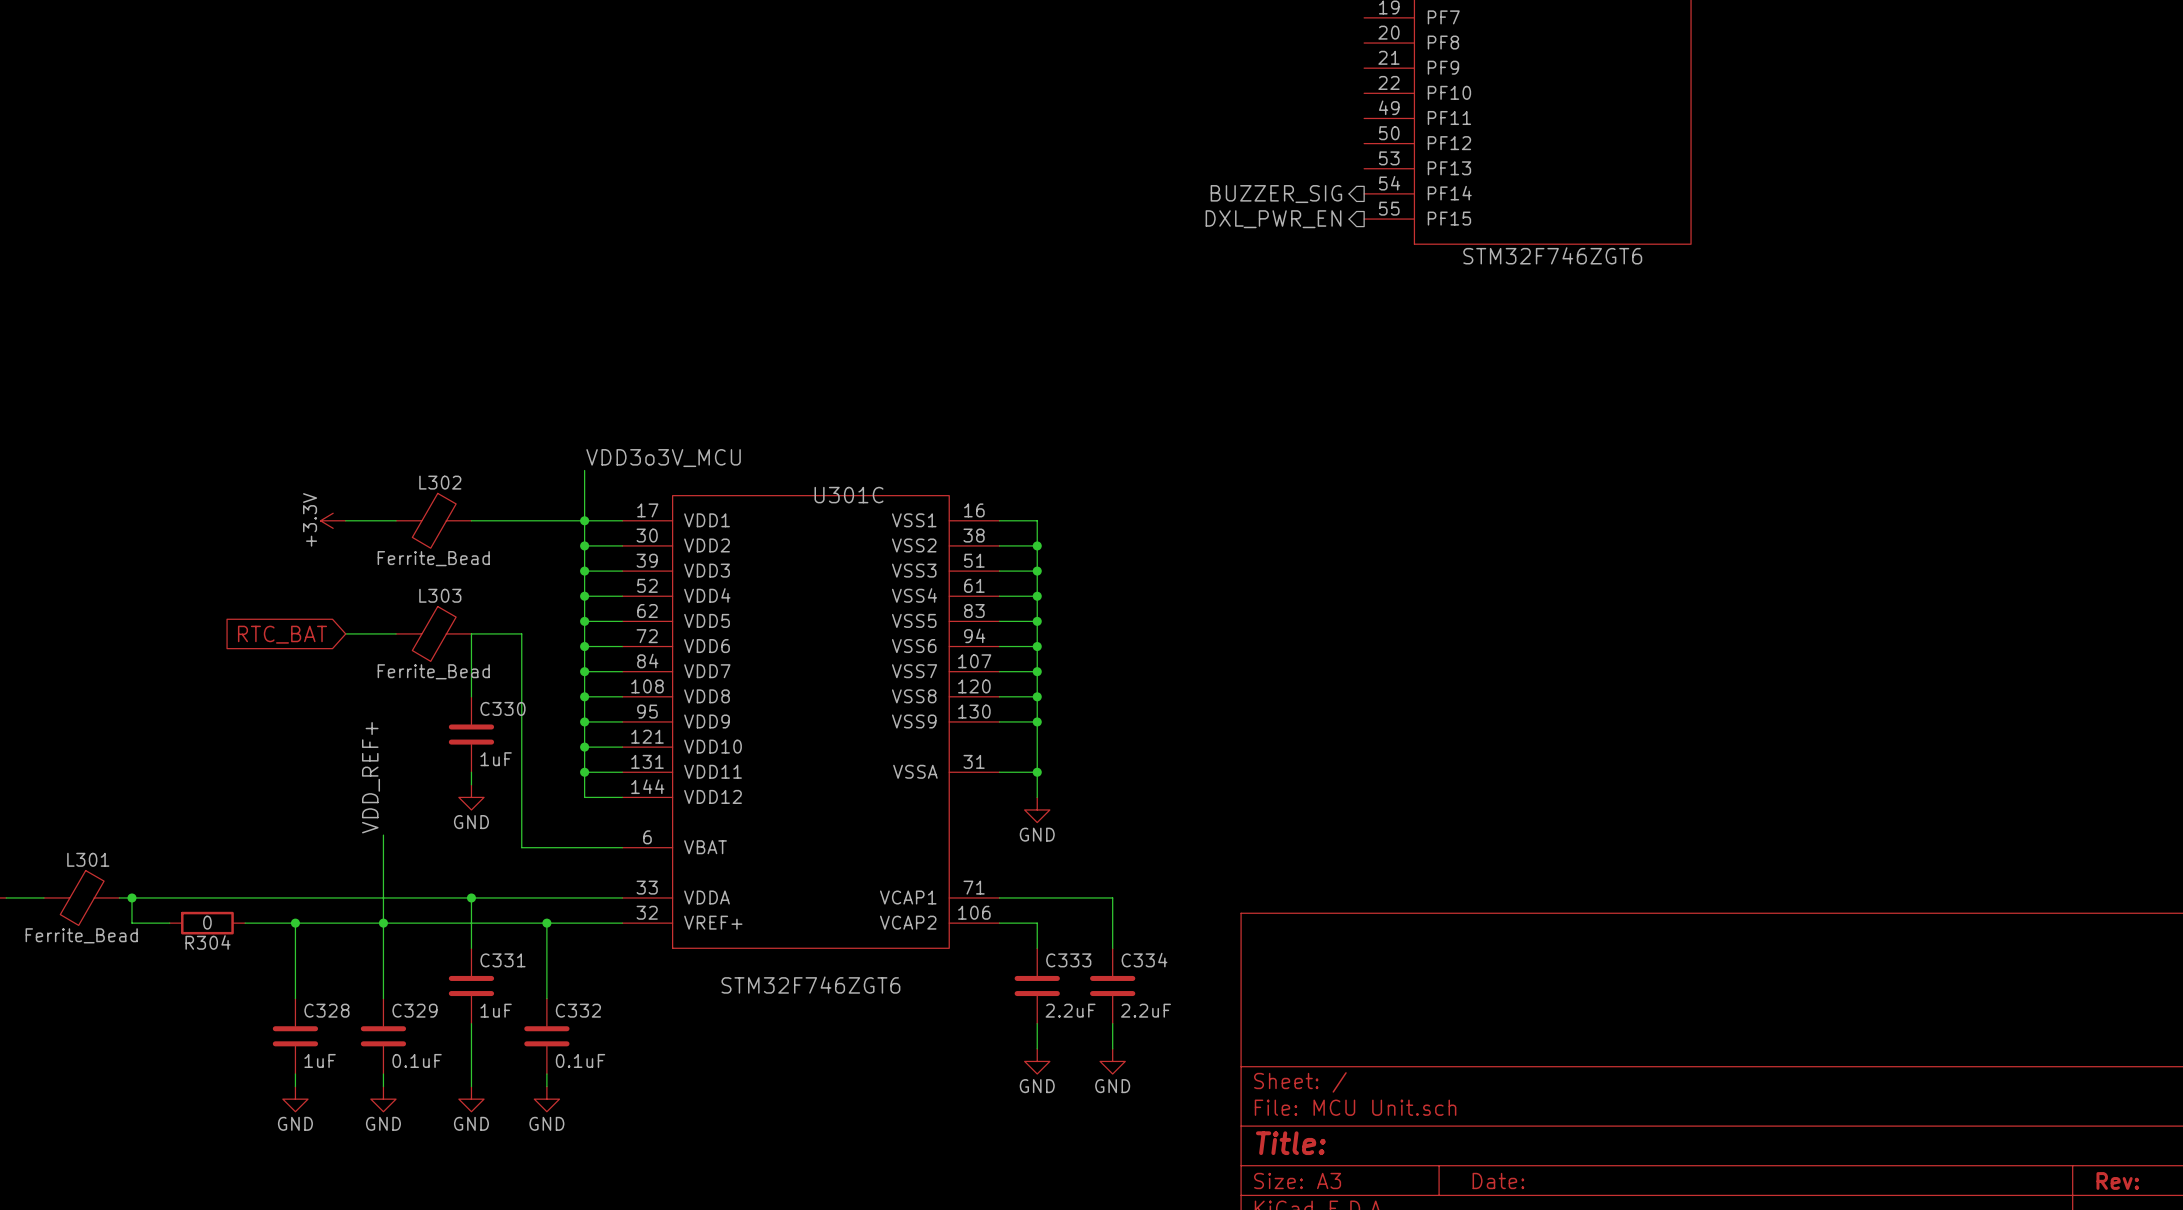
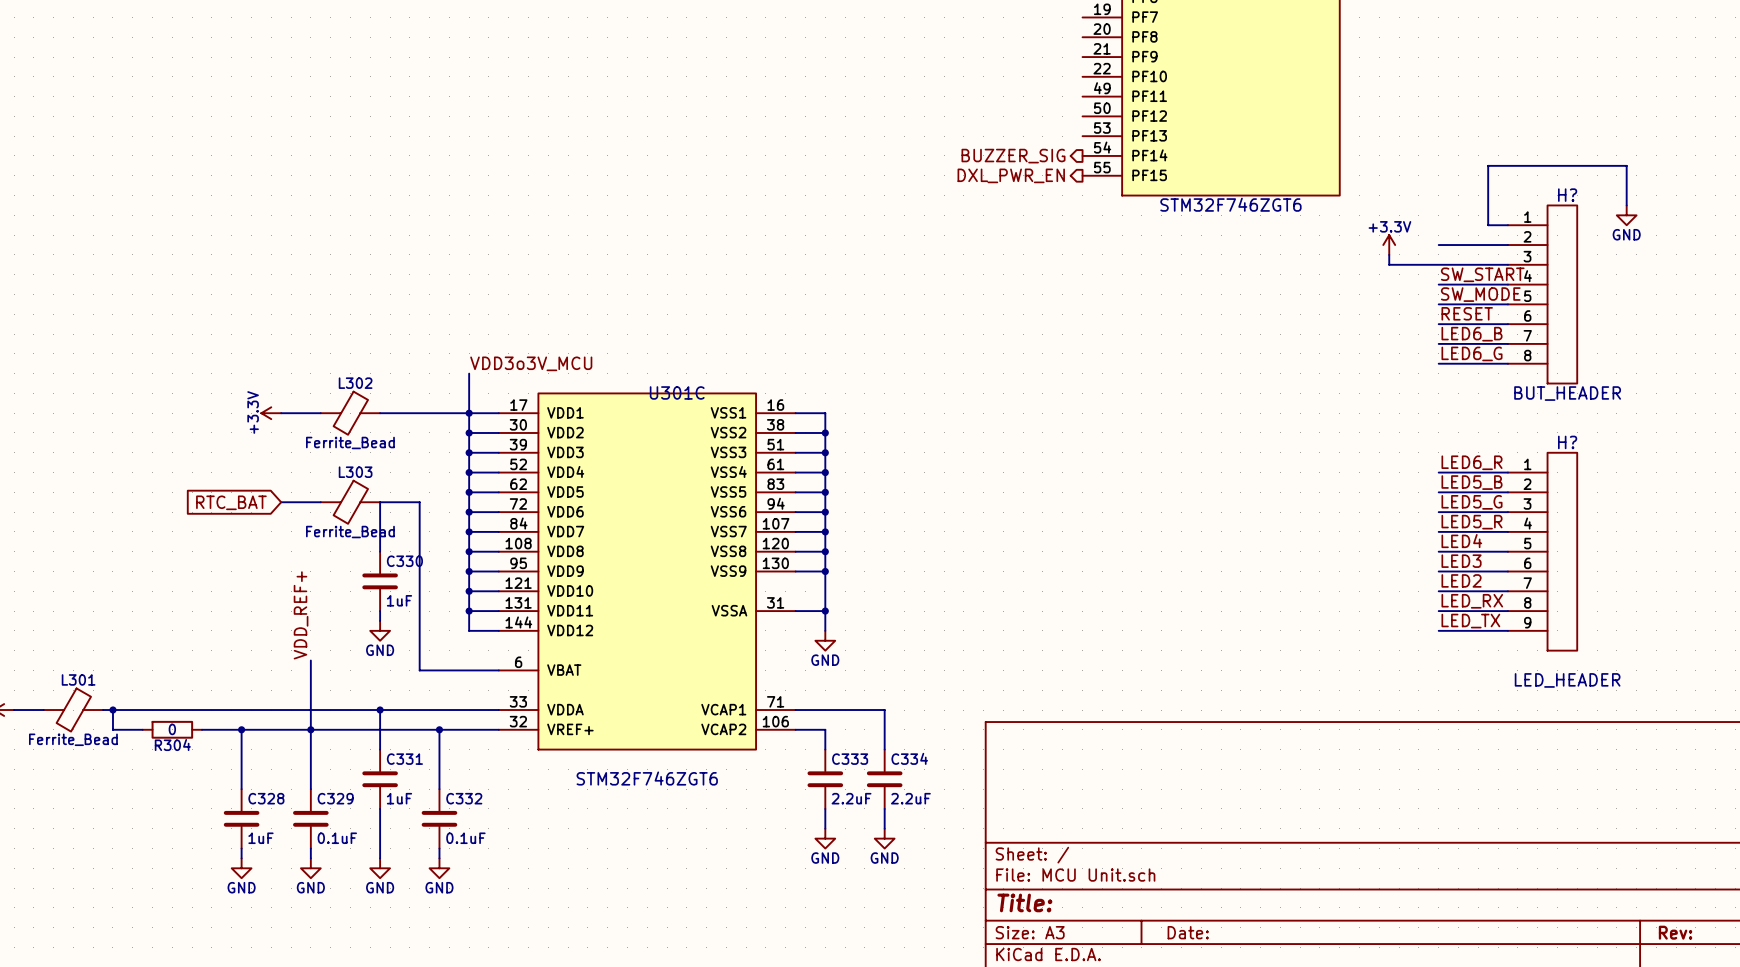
wire: none -> (1626, 205) (1626, 165) (1488, 165) (1488, 225) (1507, 225)
power symbol: none -> GND (1626, 215)
power symbol: none -> +3.3V (1389, 245)
wire: none -> (1438, 245) (1507, 245)
wire: none -> (1389, 254) (1389, 264) (1507, 264)
label: none -> SW_START (1482, 274)
wire: none -> (1438, 284) (1507, 284)
H?: none -> BUT_HEADER (1542, 294)
label: none -> SW_MODE (1480, 294)
wire: none -> (1438, 304) (1507, 304)
label: none -> RESET (1467, 313)
wire: none -> (1438, 324) (1507, 324)
label: none -> LED6_B (1471, 334)
wire: none -> (1438, 343) (1507, 343)
label: none -> LED6_G (1471, 353)
wire: none -> (1438, 363) (1507, 363)
label: none -> LED6_R (1471, 462)
wire: none -> (1438, 472) (1507, 472)
label: none -> LED5_B (1471, 482)
wire: none -> (1438, 492) (1507, 492)
label: none -> LED5_G (1471, 502)
wire: none -> (1438, 512) (1507, 512)
label: none -> LED5_R (1471, 522)
wire: none -> (1438, 531) (1507, 531)
label: none -> LED4 (1461, 541)
wire: none -> (1438, 551) (1507, 551)
H?: none -> LED_HEADER (1542, 551)
label: none -> LED3 (1461, 561)
wire: none -> (1438, 571) (1507, 571)
label: none -> LED2 (1461, 580)
wire: none -> (1438, 591) (1507, 591)
label: none -> LED_RX (1472, 601)
wire: none -> (1438, 611) (1507, 611)
label: none -> LED_TX (1470, 621)
wire: none -> (1438, 630) (1507, 630)

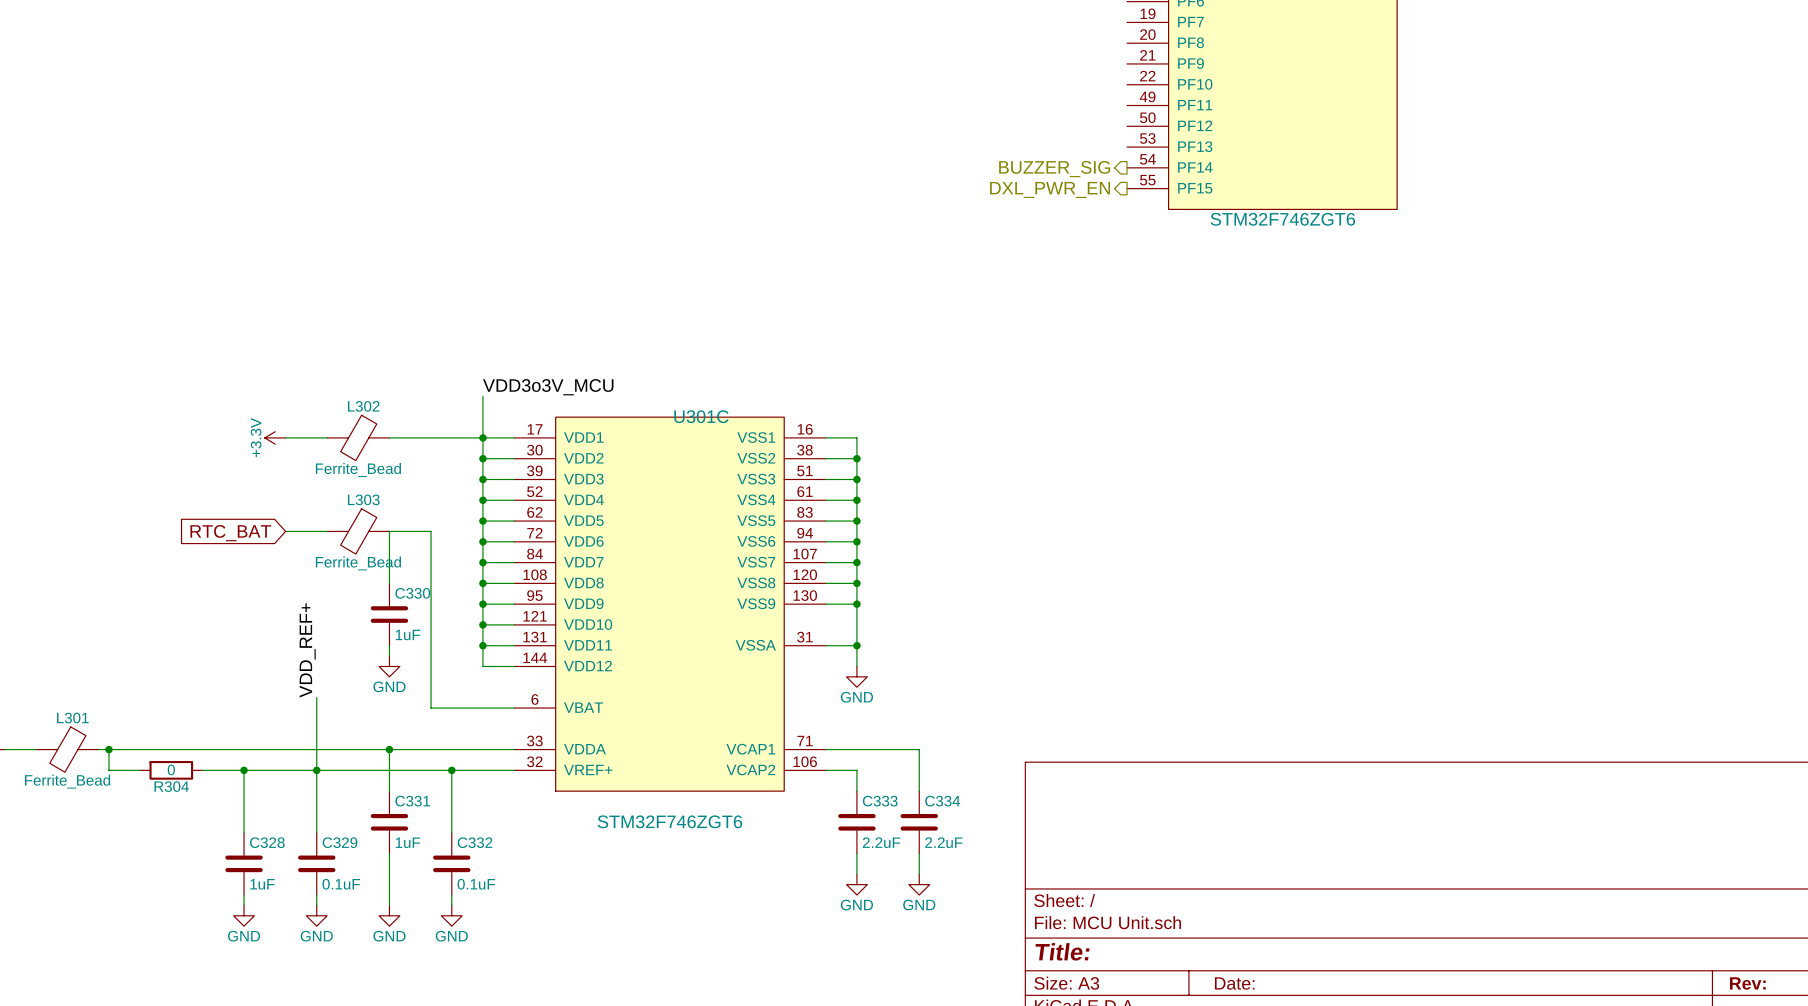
wire: (1626, 205) (1626, 165) (1488, 165) (1488, 225) (1507, 225) -> none
power symbol: GND (1626, 215) -> none
power symbol: +3.3V (1389, 245) -> none
wire: (1438, 245) (1507, 245) -> none
wire: (1389, 254) (1389, 264) (1507, 264) -> none
label: SW_START (1482, 274) -> none
wire: (1438, 284) (1507, 284) -> none
label: SW_MODE (1480, 294) -> none
H?: BUT_HEADER (1542, 294) -> none
wire: (1438, 304) (1507, 304) -> none
label: RESET (1467, 313) -> none
wire: (1438, 324) (1507, 324) -> none
label: LED6_B (1471, 334) -> none
wire: (1438, 343) (1507, 343) -> none
label: LED6_G (1471, 353) -> none
wire: (1438, 363) (1507, 363) -> none
label: LED6_R (1471, 462) -> none
wire: (1438, 472) (1507, 472) -> none
label: LED5_B (1471, 482) -> none
wire: (1438, 492) (1507, 492) -> none
label: LED5_G (1471, 502) -> none
wire: (1438, 512) (1507, 512) -> none
label: LED5_R (1471, 522) -> none
wire: (1438, 531) (1507, 531) -> none
label: LED4 (1461, 541) -> none
wire: (1438, 551) (1507, 551) -> none
H?: LED_HEADER (1542, 551) -> none
label: LED3 (1461, 561) -> none
wire: (1438, 571) (1507, 571) -> none
label: LED2 (1461, 580) -> none
wire: (1438, 591) (1507, 591) -> none
label: LED_RX (1472, 601) -> none
wire: (1438, 611) (1507, 611) -> none
label: LED_TX (1470, 621) -> none
wire: (1438, 630) (1507, 630) -> none

